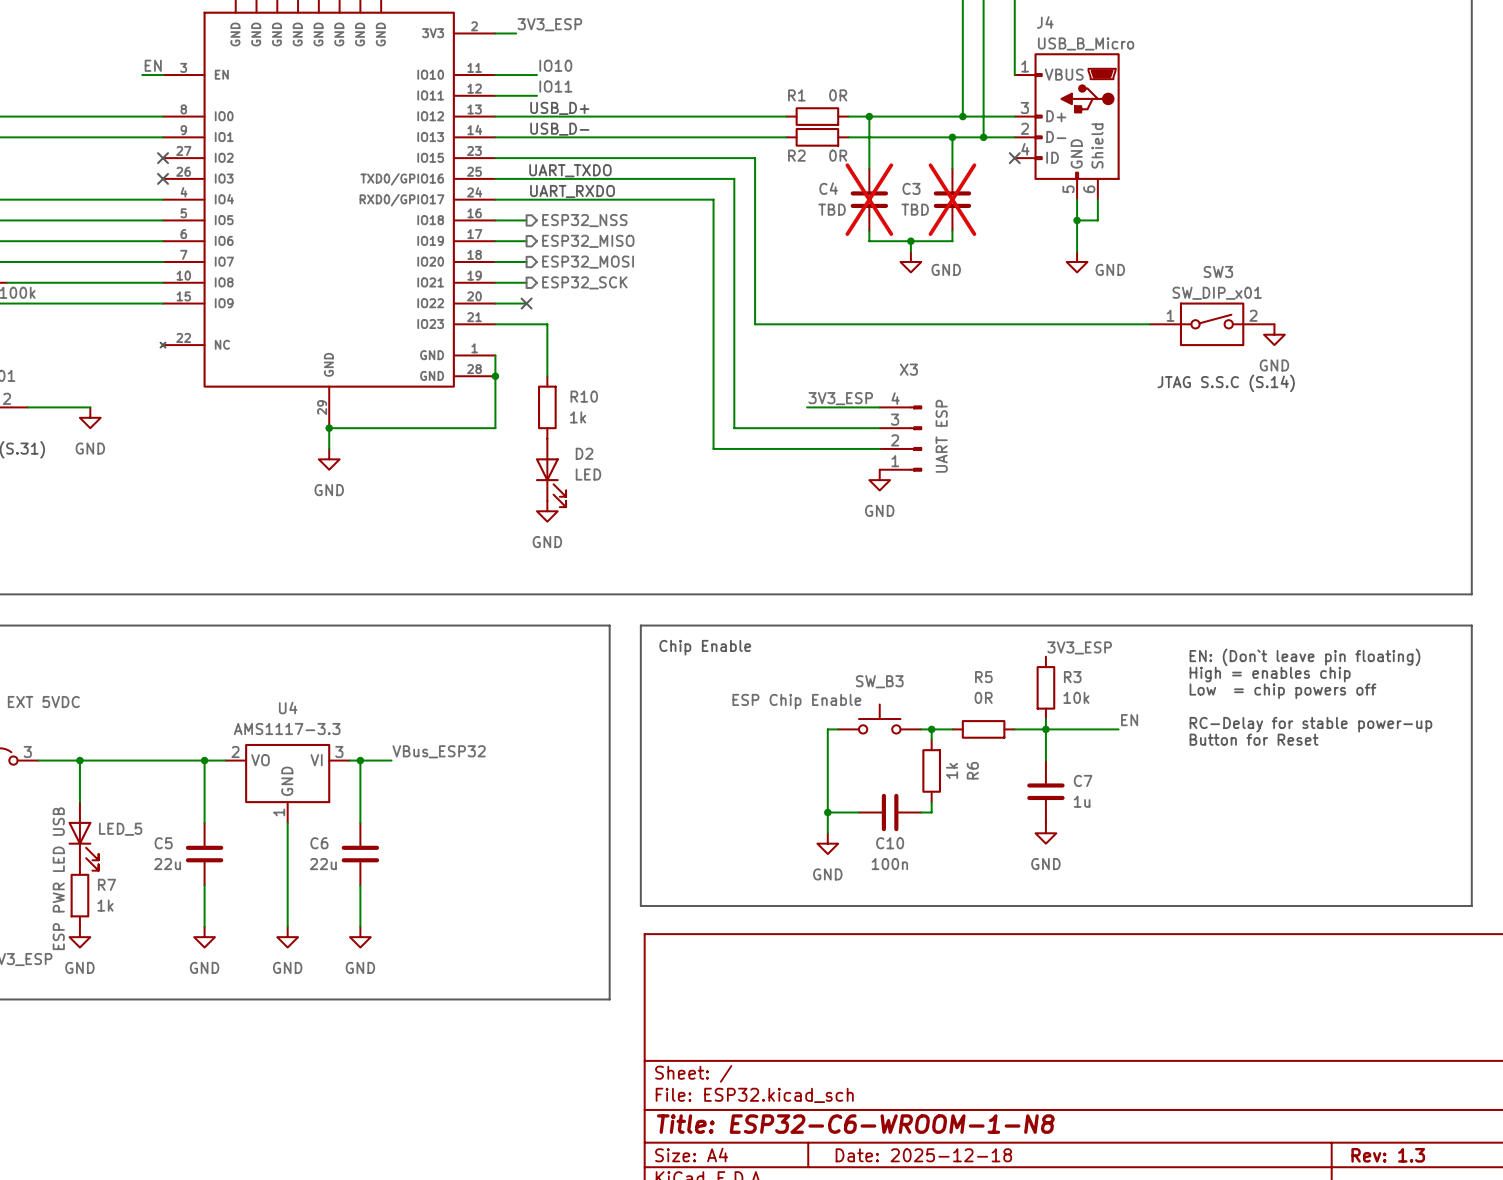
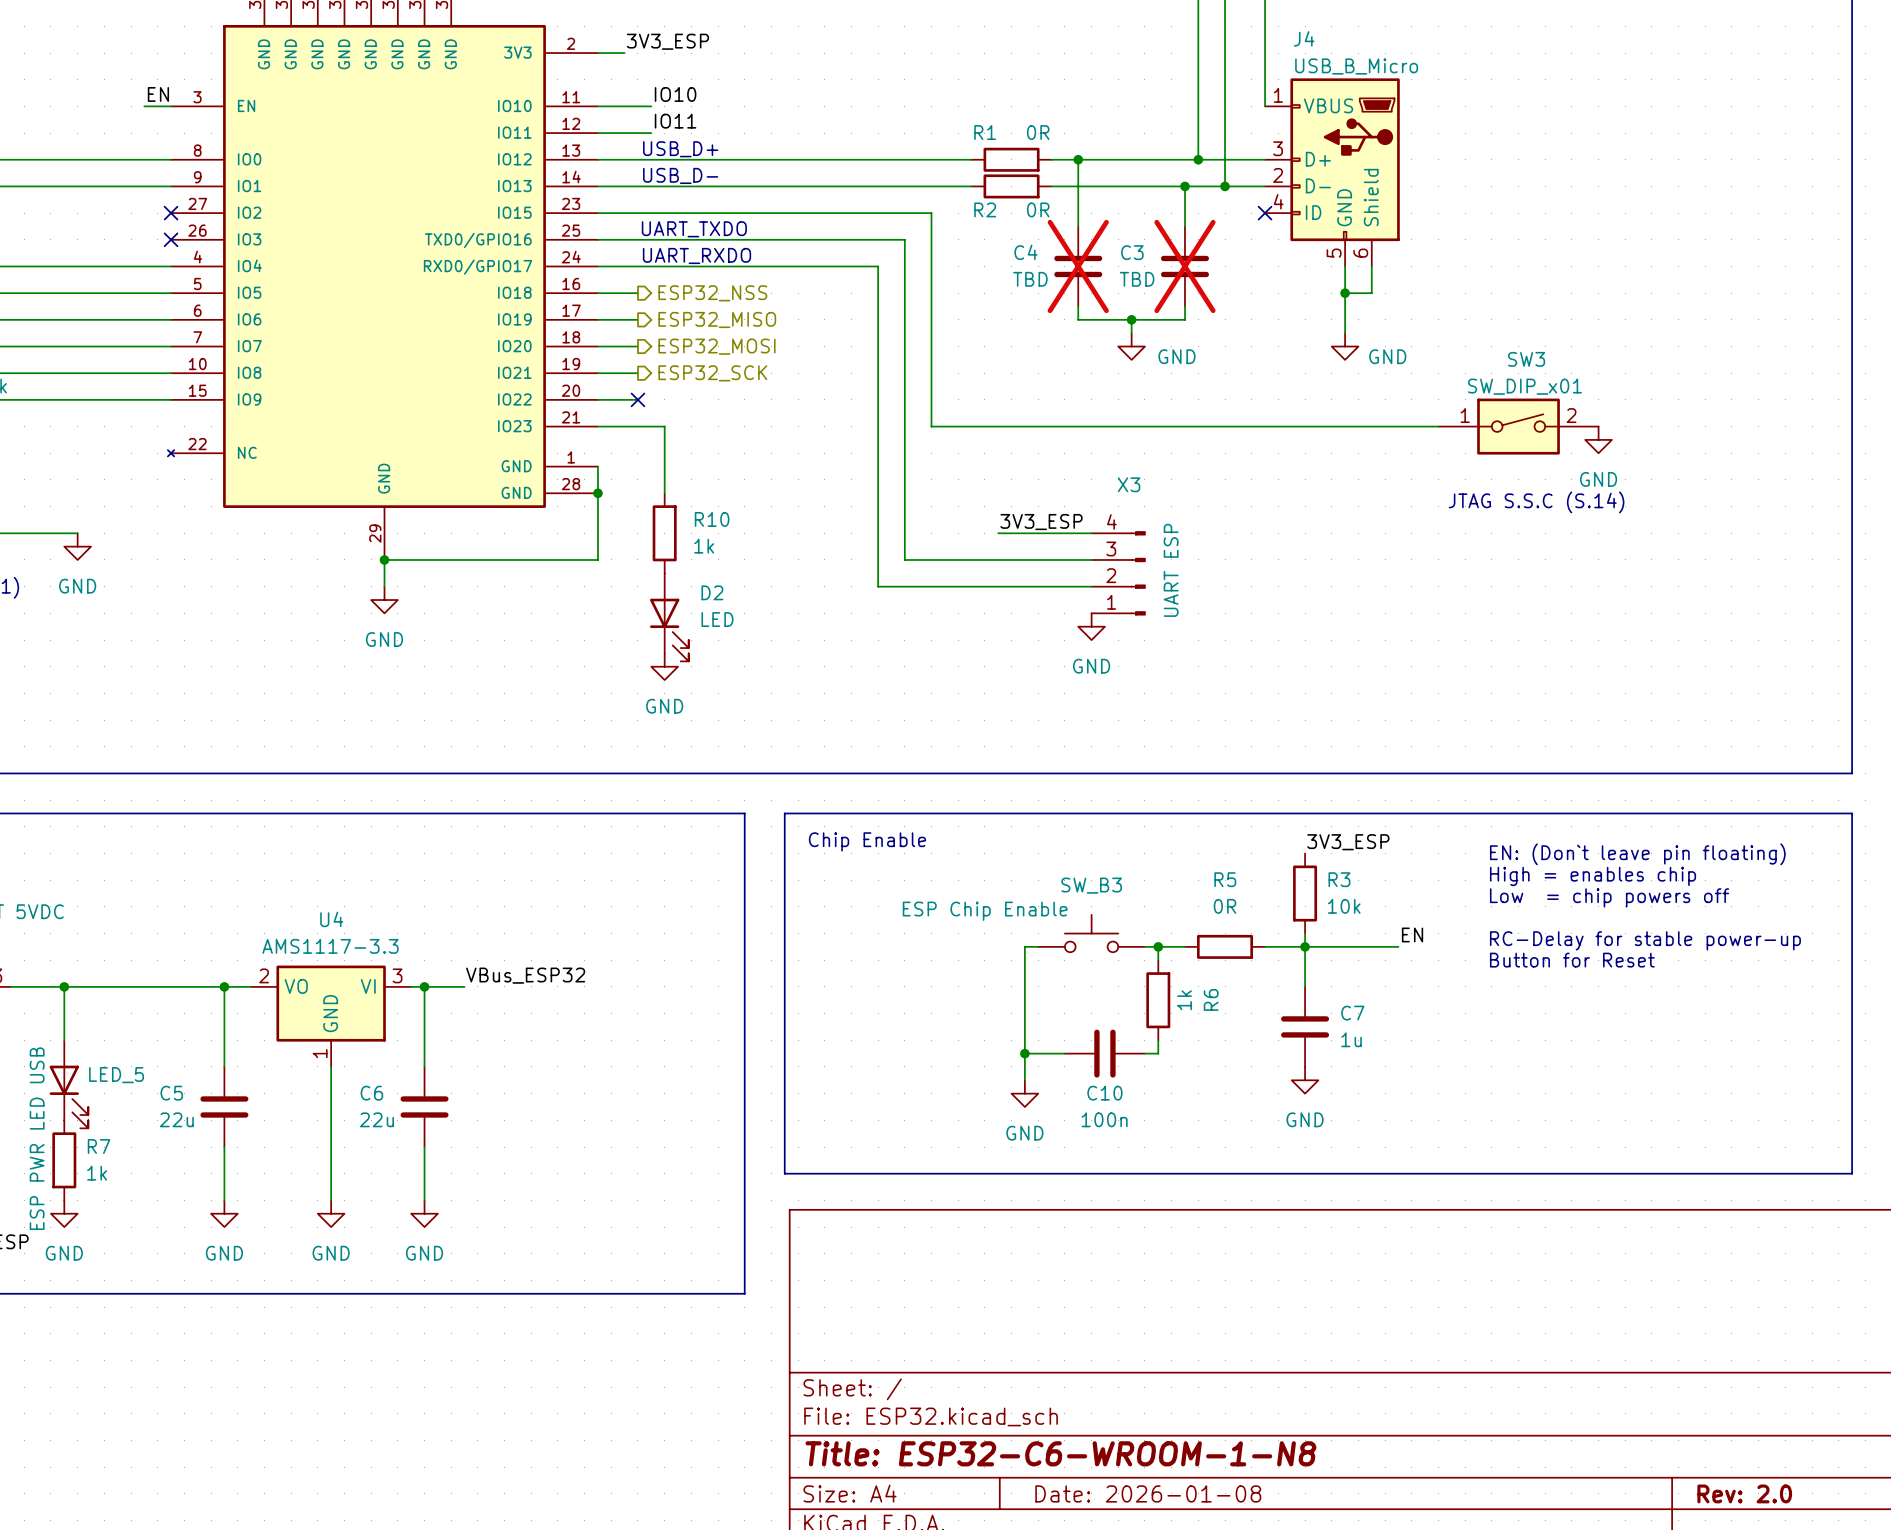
title block: Date: 2025-12-18 (923, 1155) -> Date: 2026-01-08 (1148, 1493)
title block: Rev: 1.3 (1388, 1155) -> Rev: 2.0 (1744, 1493)

